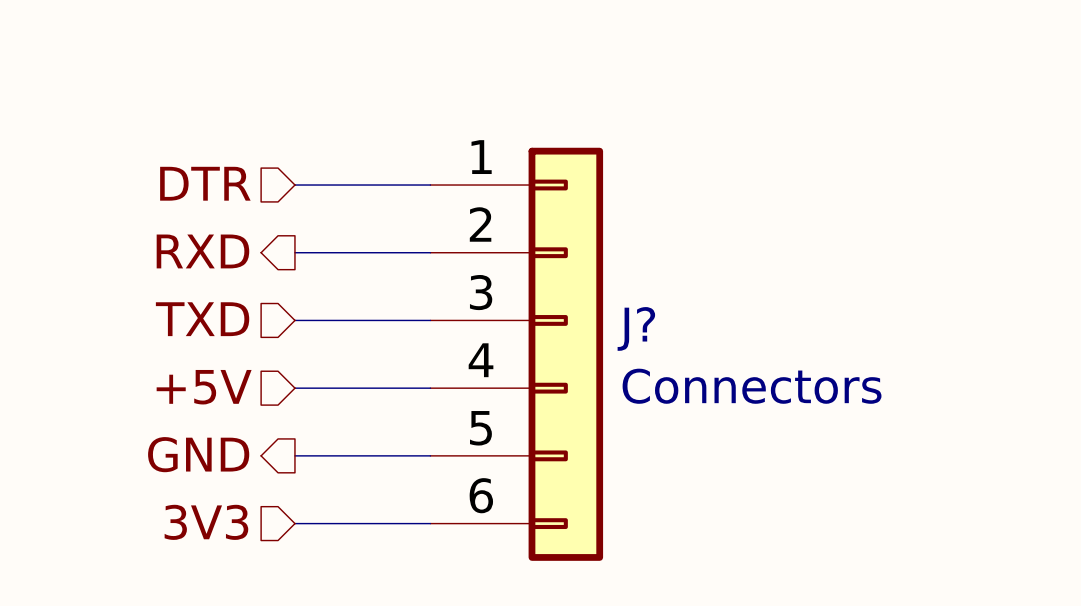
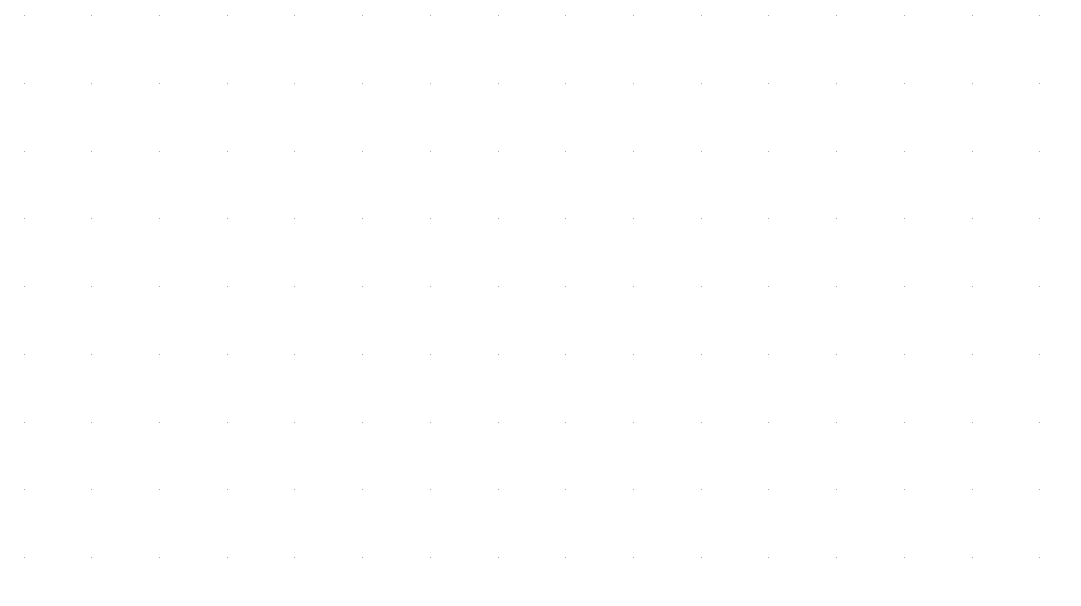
hierarchical label: DTR (205, 183) -> none
wire: (294, 185) (430, 185) -> none
hierarchical label: RXD (202, 251) -> none
wire: (294, 252) (430, 252) -> none
hierarchical label: TXD (202, 319) -> none
wire: (294, 320) (430, 320) -> none
J?: Connectors (516, 354) -> none
hierarchical label: +5V (204, 387) -> none
wire: (294, 388) (430, 388) -> none
hierarchical label: GND (198, 454) -> none
wire: (294, 455) (430, 455) -> none
hierarchical label: 3V3 (206, 522) -> none
wire: (294, 523) (430, 523) -> none

